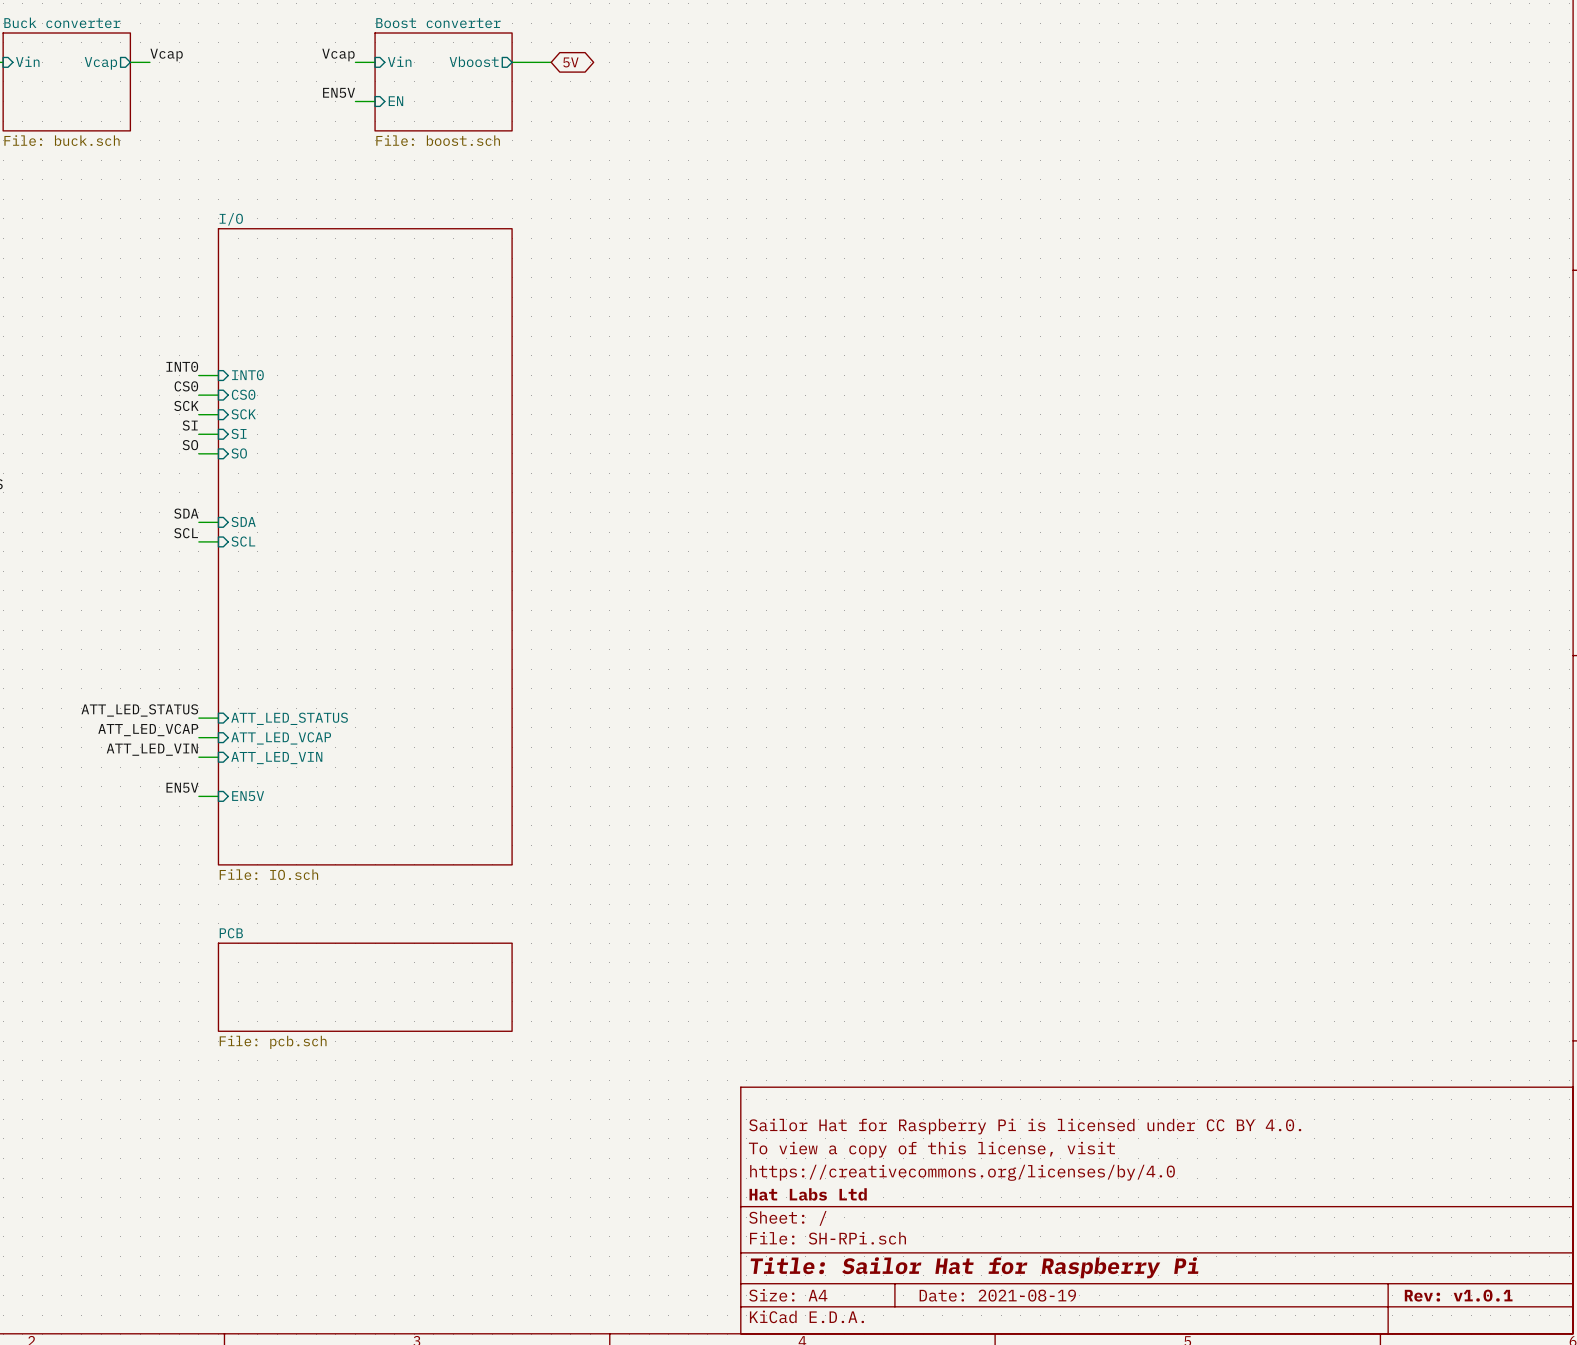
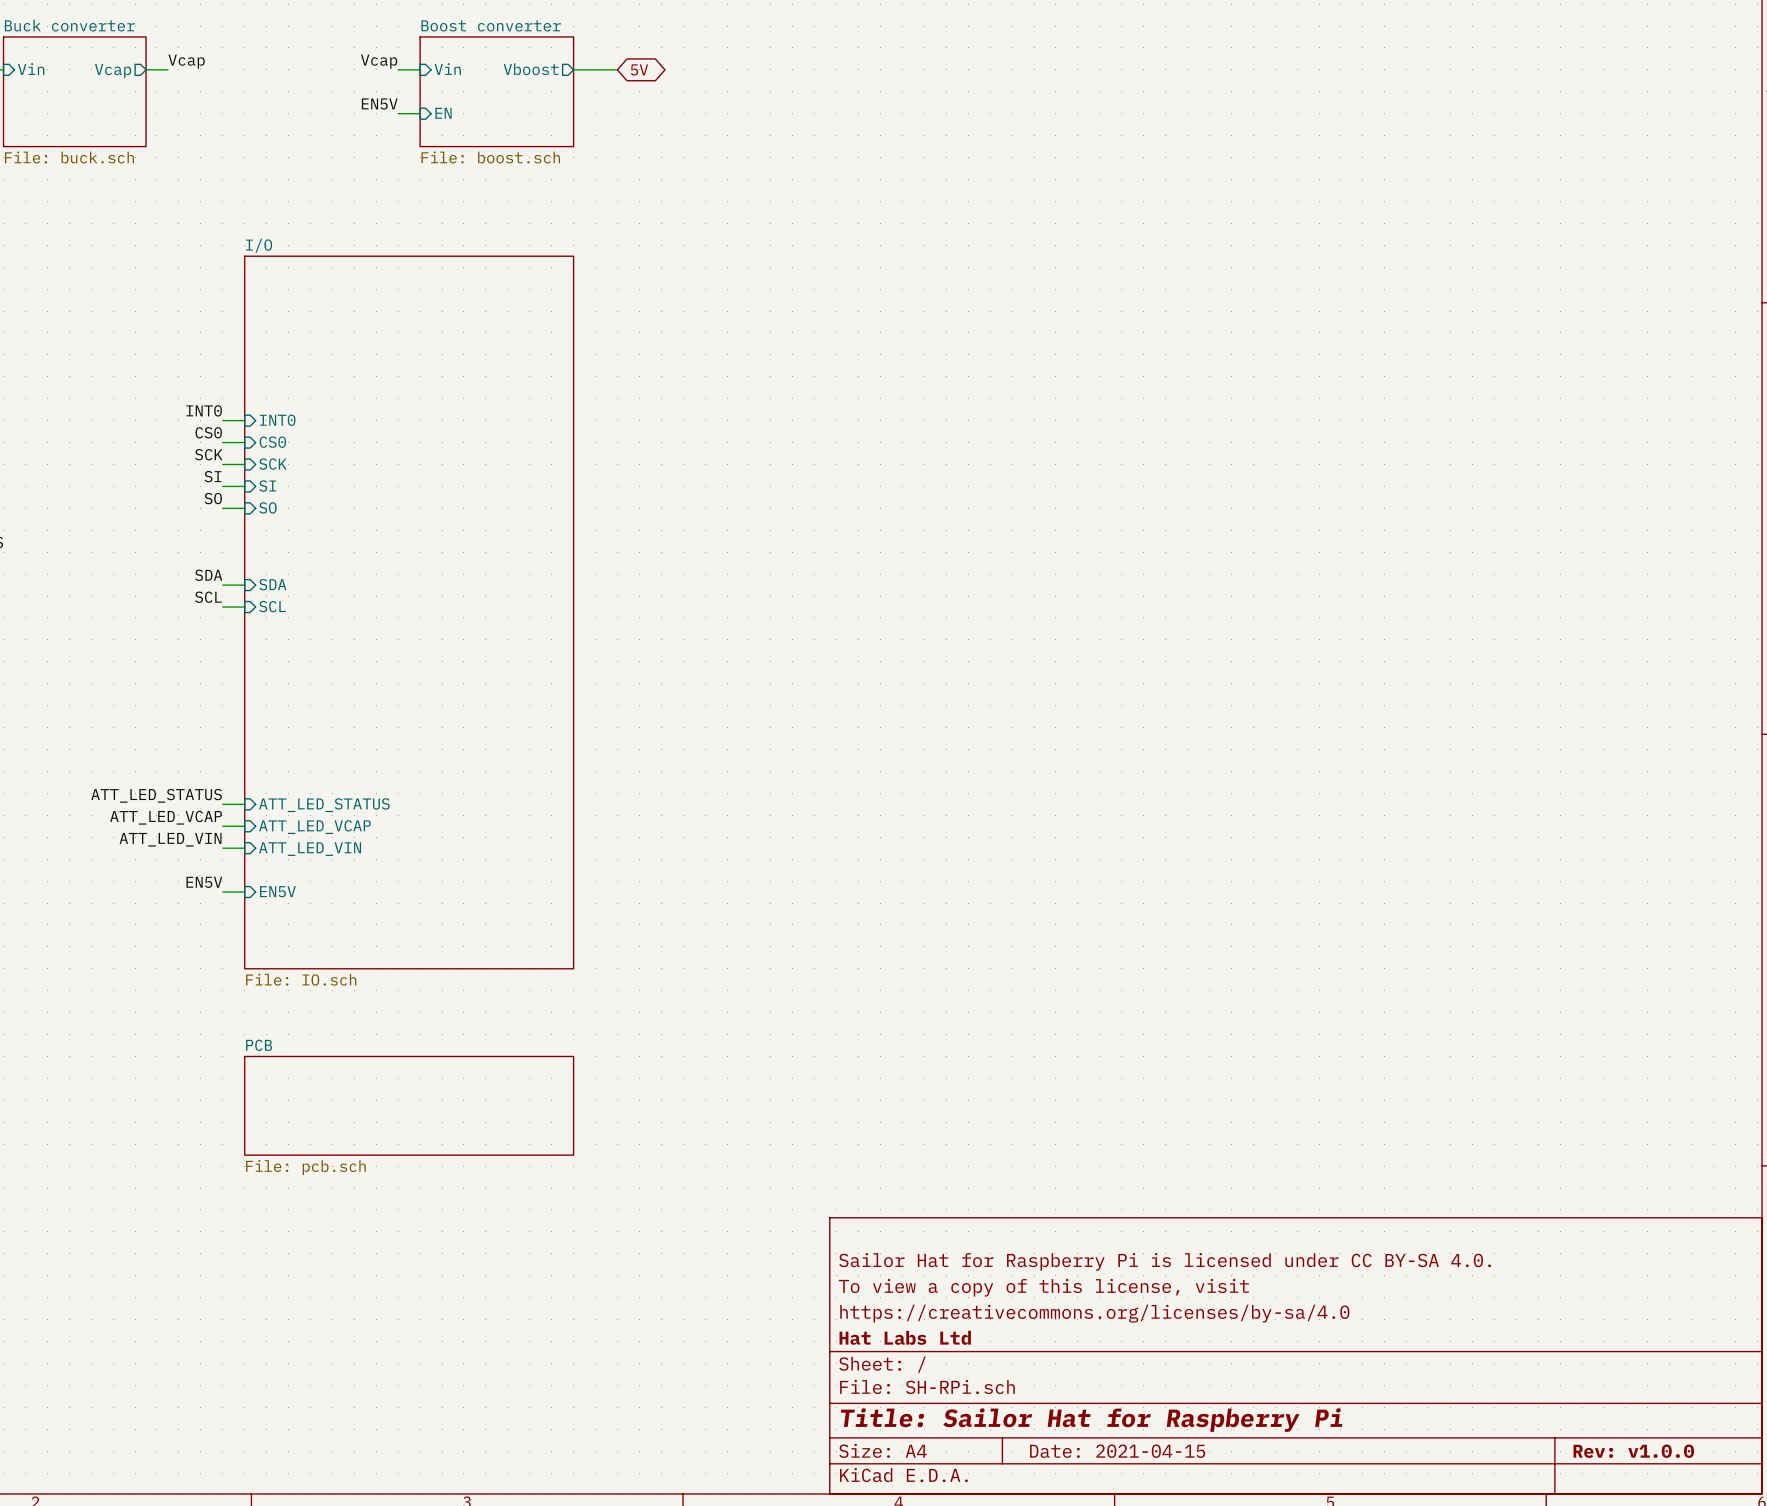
title block: Sailor Hat for Raspberry Pi is licensed under CC BY 4.0. (1025, 1126) -> Sailor Hat for Raspberry Pi is licensed under CC BY-SA 4.0. (1165, 1261)
title block: https://creativecommons.org/licenses/by/4.0 (962, 1172) -> https://creativecommons.org/licenses/by-sa/4.0 (1094, 1313)
title block: Date: 2021-08-19 (997, 1295) -> Date: 2021-04-15 (1117, 1451)
title block: Rev: v1.0.1 (1458, 1295) -> Rev: v1.0.0 (1633, 1451)

